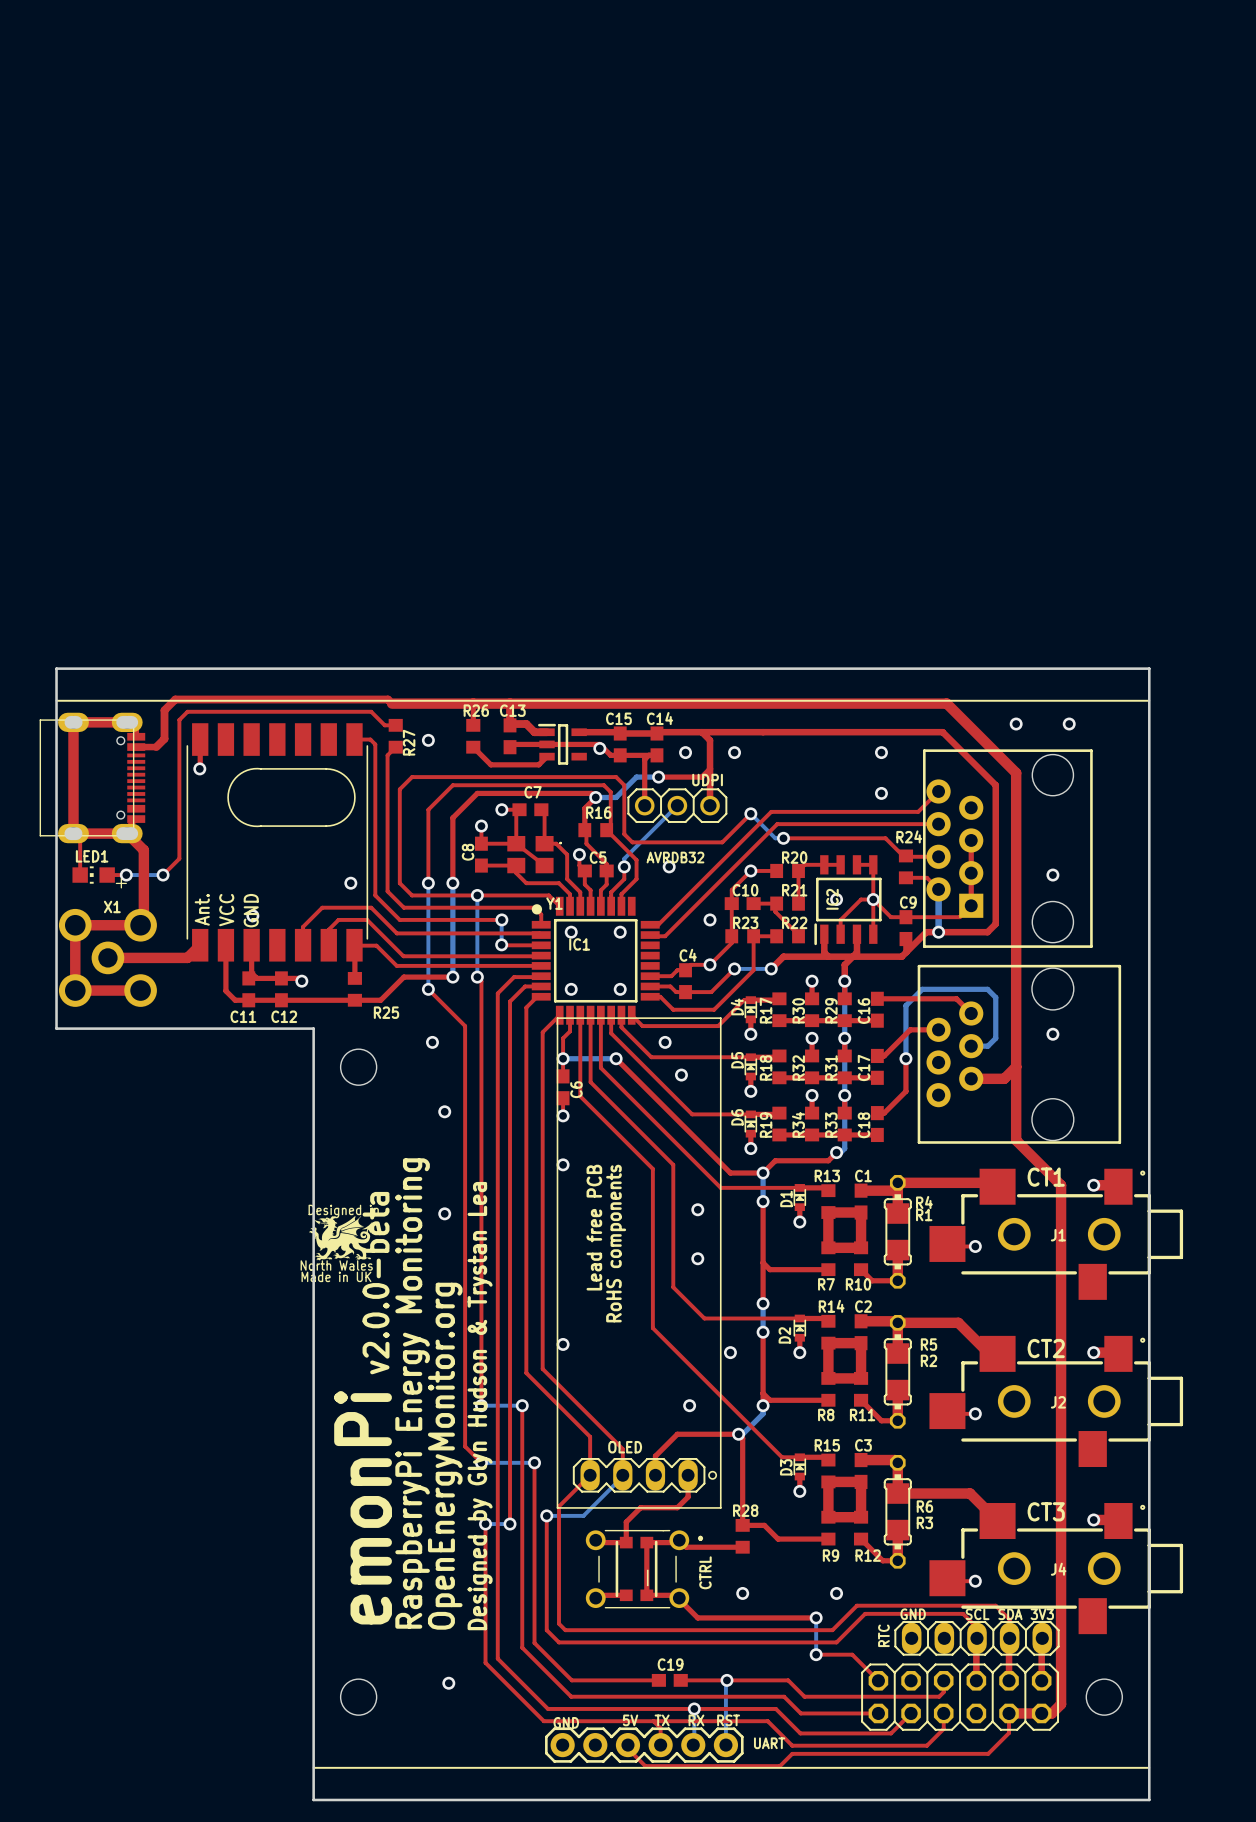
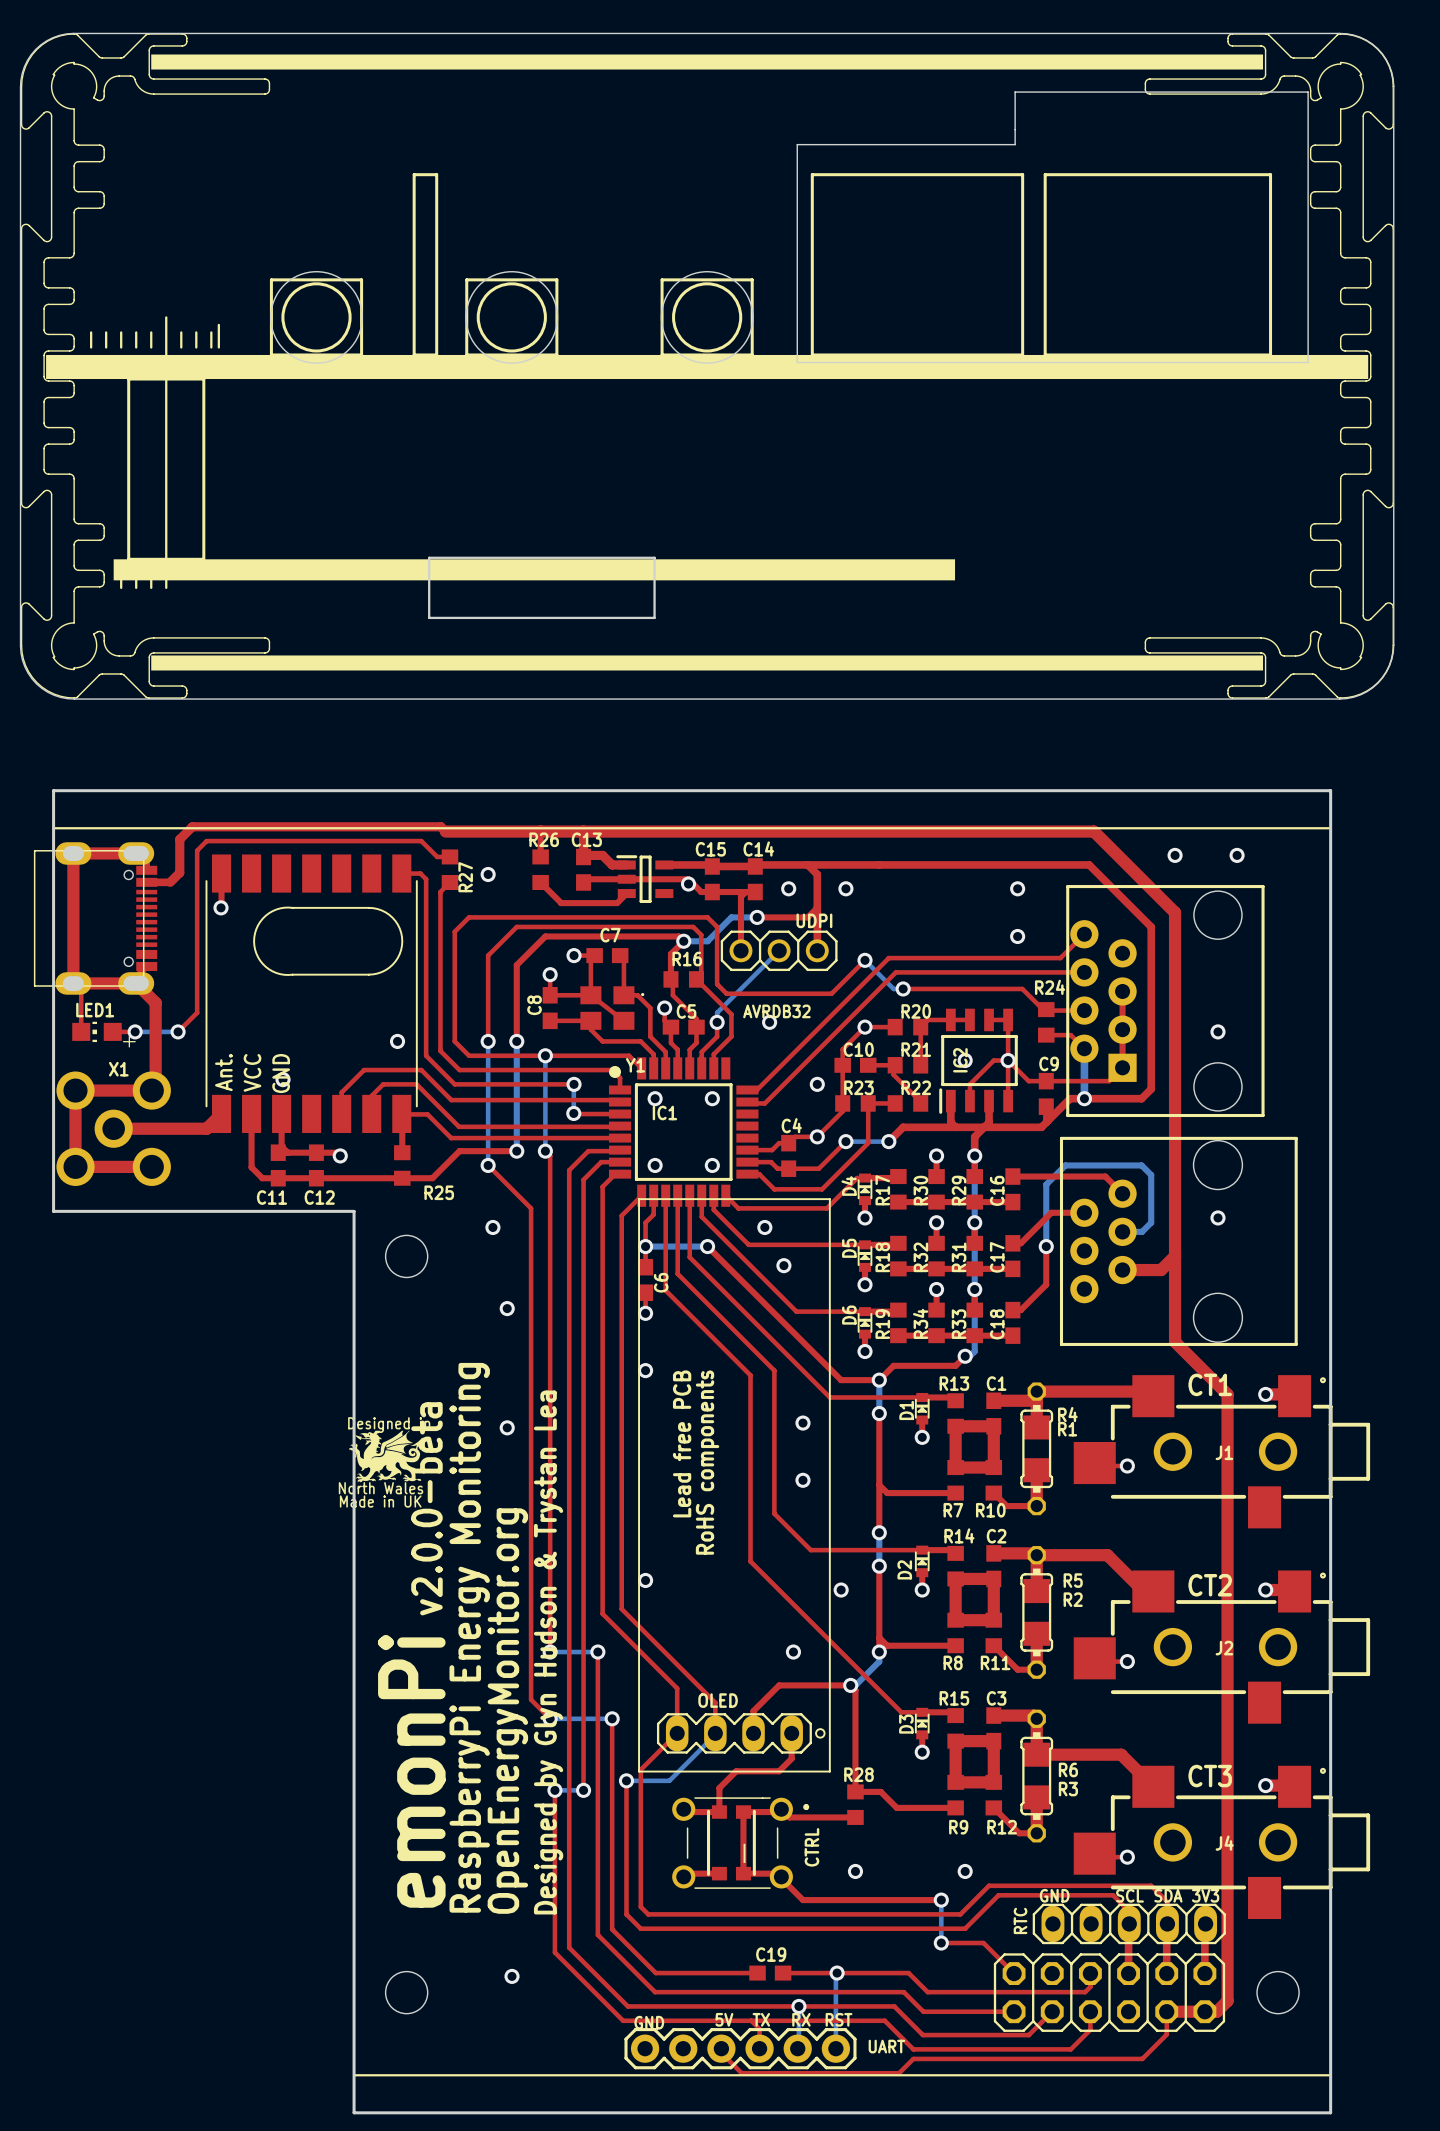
board edge: none -> (73, 33) (1339, 33) (1353, 35) (1366, 40) (1377, 48) (1386, 59) (1391, 72) (1393, 86) (1393, 644) (1389, 665) (1377, 683) (1366, 691) (1353, 697) (1339, 699) (74, 699) (60, 697) (47, 692) (36, 683) (28, 673) (22, 660) (20, 646) (20, 87) (24, 67) (35, 49) (52, 37) (73, 33)
line: none -> (74, 33) (102, 57) (123, 57) (147, 34) (183, 34) (186, 38) (184, 45) (153, 45) (150, 47) (149, 74) (151, 78) (264, 79) (269, 82) (269, 91) (265, 94) (153, 94) (141, 89) (132, 76) (117, 76) (107, 81) (103, 97) (99, 100) (93, 97) (96, 86) (93, 75) (85, 67) (74, 62) (64, 64) (57, 69) (53, 74) (51, 82) (52, 93) (56, 100) (64, 106) (74, 109) (75, 143) (100, 145) (104, 149) (104, 158) (101, 161) (78, 161) (74, 166) (75, 189) (101, 192) (104, 195) (103, 205) (100, 208) (75, 209) (73, 255) (70, 257) (47, 257) (44, 261) (45, 286) (70, 288) (74, 292) (74, 300) (71, 303) (48, 304) (44, 308) (45, 333) (70, 334) (74, 338) (74, 347) (71, 350) (48, 351) (44, 354) (45, 379) (70, 381) (74, 385) (74, 393) (71, 396) (48, 397) (44, 400) (45, 425) (71, 427) (73, 430) (74, 439) (70, 443) (45, 445) (44, 470) (48, 474) (72, 475) (74, 521) (78, 523) (100, 523) (104, 528) (104, 536) (101, 539) (78, 540) (74, 543) (75, 568) (101, 570) (104, 574) (104, 582) (100, 586) (78, 586) (75, 588) (74, 622) (64, 625) (54, 634) (51, 644) (53, 657) (59, 664) (67, 668) (74, 669) (84, 665) (94, 654) (96, 644) (93, 634) (99, 631) (103, 634) (107, 650) (113, 654) (119, 655) (132, 655) (140, 643) (151, 638) (264, 637) (268, 639) (269, 649) (265, 652) (151, 653) (149, 657) (150, 684) (153, 686) (184, 686) (186, 694) (182, 697) (147, 697) (121, 673) (100, 674) (76, 697) (60, 696) (47, 690) (36, 682) (25, 665) (22, 652) (22, 604) (28, 603) (45, 619) (49, 619) (51, 615) (51, 493) (48, 490) (44, 490) (27, 507) (23, 506) (21, 503) (21, 228) (23, 224) (27, 224) (44, 241) (48, 241) (51, 238) (51, 116) (49, 112) (45, 112) (28, 128) (22, 127) (22, 79) (25, 66) (36, 49) (54, 37) (74, 33)
line: none -> (1232, 33) (1267, 34) (1293, 57) (1314, 57) (1338, 34) (1354, 35) (1366, 41) (1377, 49) (1389, 66) (1392, 79) (1392, 127) (1386, 128) (1369, 111) (1365, 112) (1363, 116) (1363, 238) (1366, 241) (1370, 240) (1387, 224) (1391, 225) (1393, 228) (1393, 503) (1390, 507) (1387, 507) (1370, 491) (1366, 490) (1363, 493) (1363, 615) (1365, 619) (1369, 620) (1386, 603) (1392, 604) (1392, 652) (1389, 665) (1377, 682) (1360, 694) (1347, 697) (1337, 697) (1314, 674) (1293, 673) (1267, 697) (1231, 697) (1228, 693) (1230, 686) (1261, 686) (1264, 684) (1265, 657) (1263, 653) (1149, 652) (1145, 649) (1145, 640) (1149, 637) (1261, 637) (1273, 642) (1282, 655) (1297, 655) (1307, 650) (1310, 634) (1315, 631) (1321, 634) (1318, 645) (1321, 656) (1329, 664) (1340, 669) (1349, 667) (1357, 662) (1361, 657) (1363, 648) (1362, 639) (1356, 629) (1349, 624) (1340, 622) (1339, 588) (1313, 586) (1310, 582) (1310, 573) (1312, 570) (1336, 570) (1340, 565) (1339, 542) (1312, 539) (1310, 536) (1311, 526) (1314, 523) (1339, 522) (1341, 476) (1344, 474) (1367, 474) (1370, 470) (1369, 445) (1344, 443) (1340, 439) (1340, 430) (1342, 428) (1366, 427) (1370, 423) (1369, 398) (1344, 397) (1340, 393) (1340, 384) (1342, 381) (1366, 380) (1370, 377) (1369, 352) (1344, 350) (1340, 346) (1340, 337) (1342, 335) (1366, 334) (1370, 331) (1369, 306) (1343, 304) (1340, 301) (1340, 292) (1344, 288) (1369, 286) (1370, 261) (1366, 257) (1342, 256) (1340, 210) (1336, 208) (1313, 208) (1310, 203) (1310, 195) (1312, 192) (1336, 191) (1340, 188) (1339, 163) (1313, 161) (1310, 158) (1310, 149) (1314, 145) (1336, 145) (1339, 143) (1340, 109) (1353, 105) (1360, 97) (1363, 87) (1361, 74) (1355, 67) (1346, 63) (1340, 62) (1330, 66) (1319, 77) (1318, 87) (1321, 97) (1315, 100) (1310, 97) (1307, 81) (1301, 77) (1295, 76) (1281, 76) (1274, 88) (1263, 93) (1149, 94) (1146, 92) (1145, 82) (1149, 79) (1263, 78) (1265, 74) (1264, 47) (1261, 45) (1230, 45) (1228, 37) (1232, 33)
drawing: none -> [151, 54, 1264, 70]
board edge: none -> (1015, 92) (1015, 144) (797, 144) (797, 362) (1308, 362) (1308, 92) (1015, 92)
line: none -> (414, 174) (436, 174) (436, 354) (414, 354) (414, 174)
line: none -> (812, 174) (1022, 174) (1022, 354) (812, 354) (812, 174)
line: none -> (1045, 174) (1270, 174) (1270, 354) (1045, 354) (1045, 174)
round board edge: none -> [270, 271, 363, 364]
round board edge: none -> [465, 271, 559, 364]
round board edge: none -> [660, 271, 754, 364]
line: none -> (271, 279) (271, 354) (361, 354) (361, 279) (271, 279)
line: none -> (466, 279) (556, 279) (556, 354) (466, 354) (466, 279)
line: none -> (662, 279) (752, 279) (752, 354) (662, 354) (662, 279)
drawing: none -> [46, 282, 1369, 380]
line: none -> (166, 317) (166, 572)
line: none -> (218, 324) (218, 347)
line: none -> (91, 332) (91, 347)
line: none -> (106, 332) (106, 347)
line: none -> (121, 332) (121, 347)
line: none -> (136, 332) (136, 347)
line: none -> (151, 332) (151, 347)
line: none -> (181, 332) (181, 347)
line: none -> (196, 332) (196, 347)
line: none -> (211, 332) (211, 347)
line: none -> (128, 379) (128, 559) (203, 559) (203, 379) (128, 379)
board edge: none -> (429, 557) (654, 557) (654, 617) (429, 617) (429, 557)
drawing: none -> [113, 559, 956, 581]
line: none -> (121, 580) (121, 587)
line: none -> (136, 580) (136, 587)
line: none -> (151, 580) (151, 587)
line: none -> (166, 580) (166, 587)
drawing: none -> [151, 655, 1264, 671]

